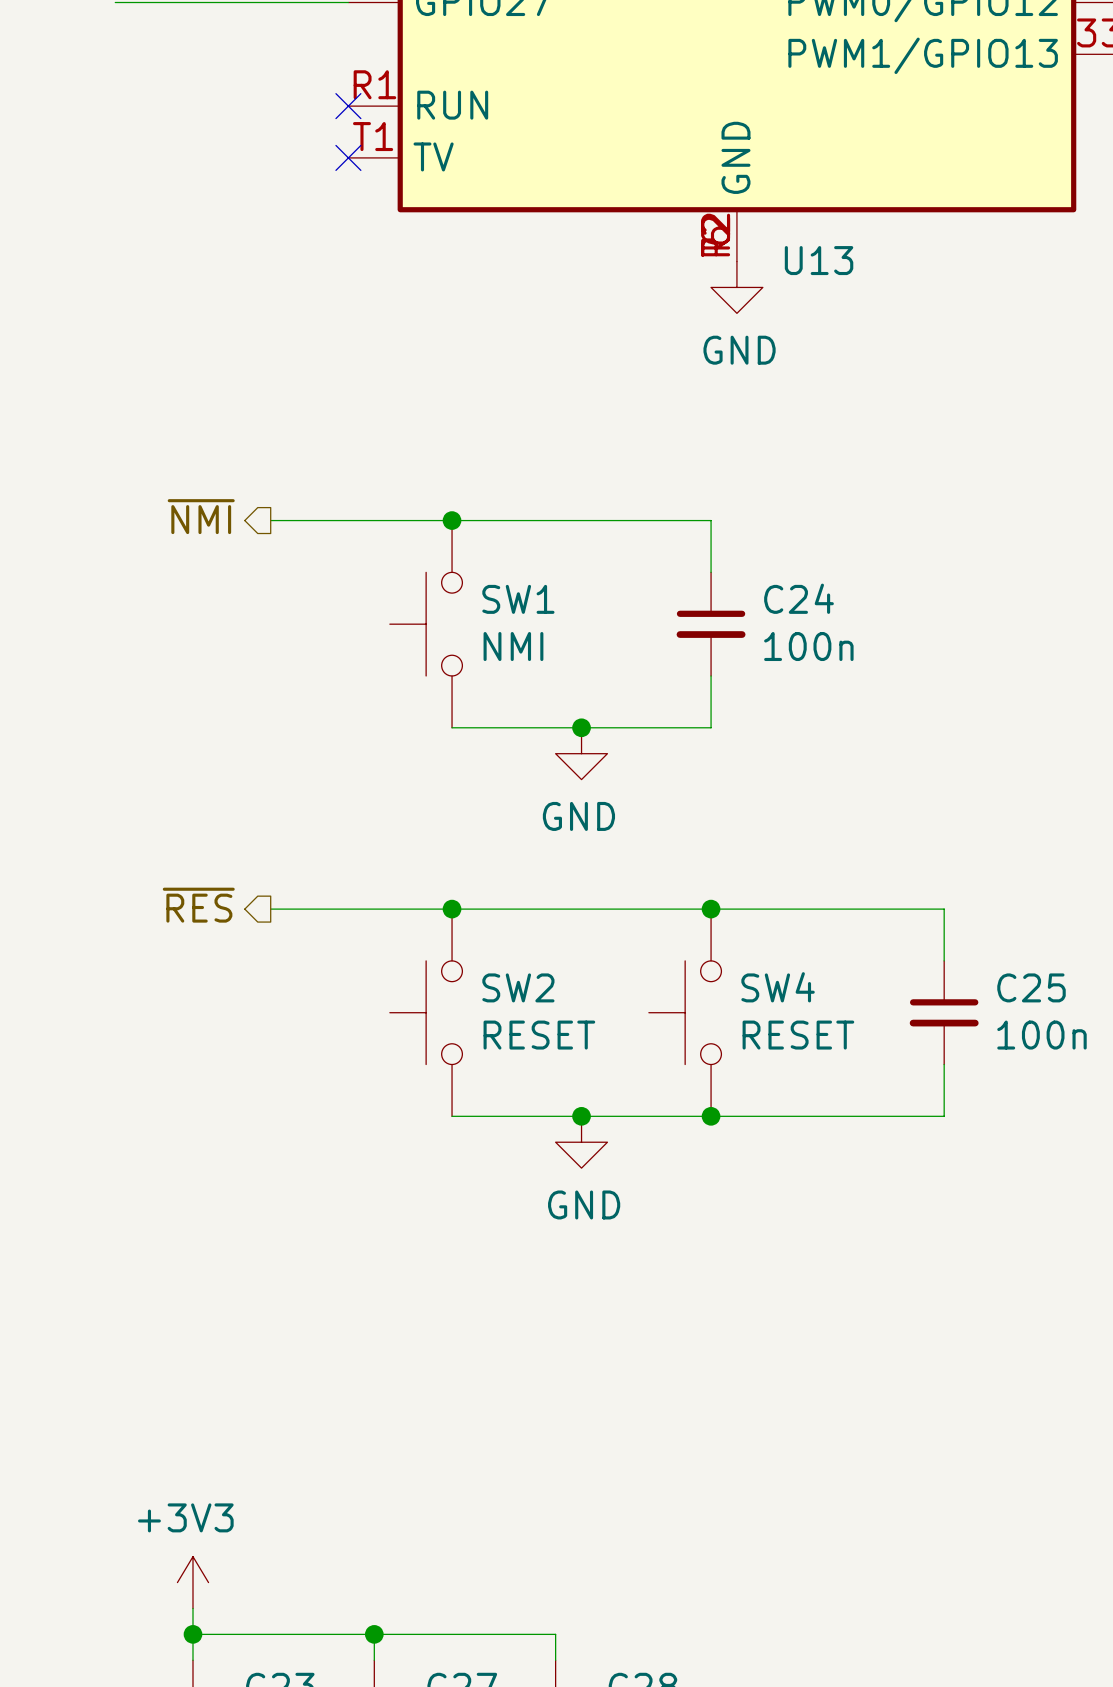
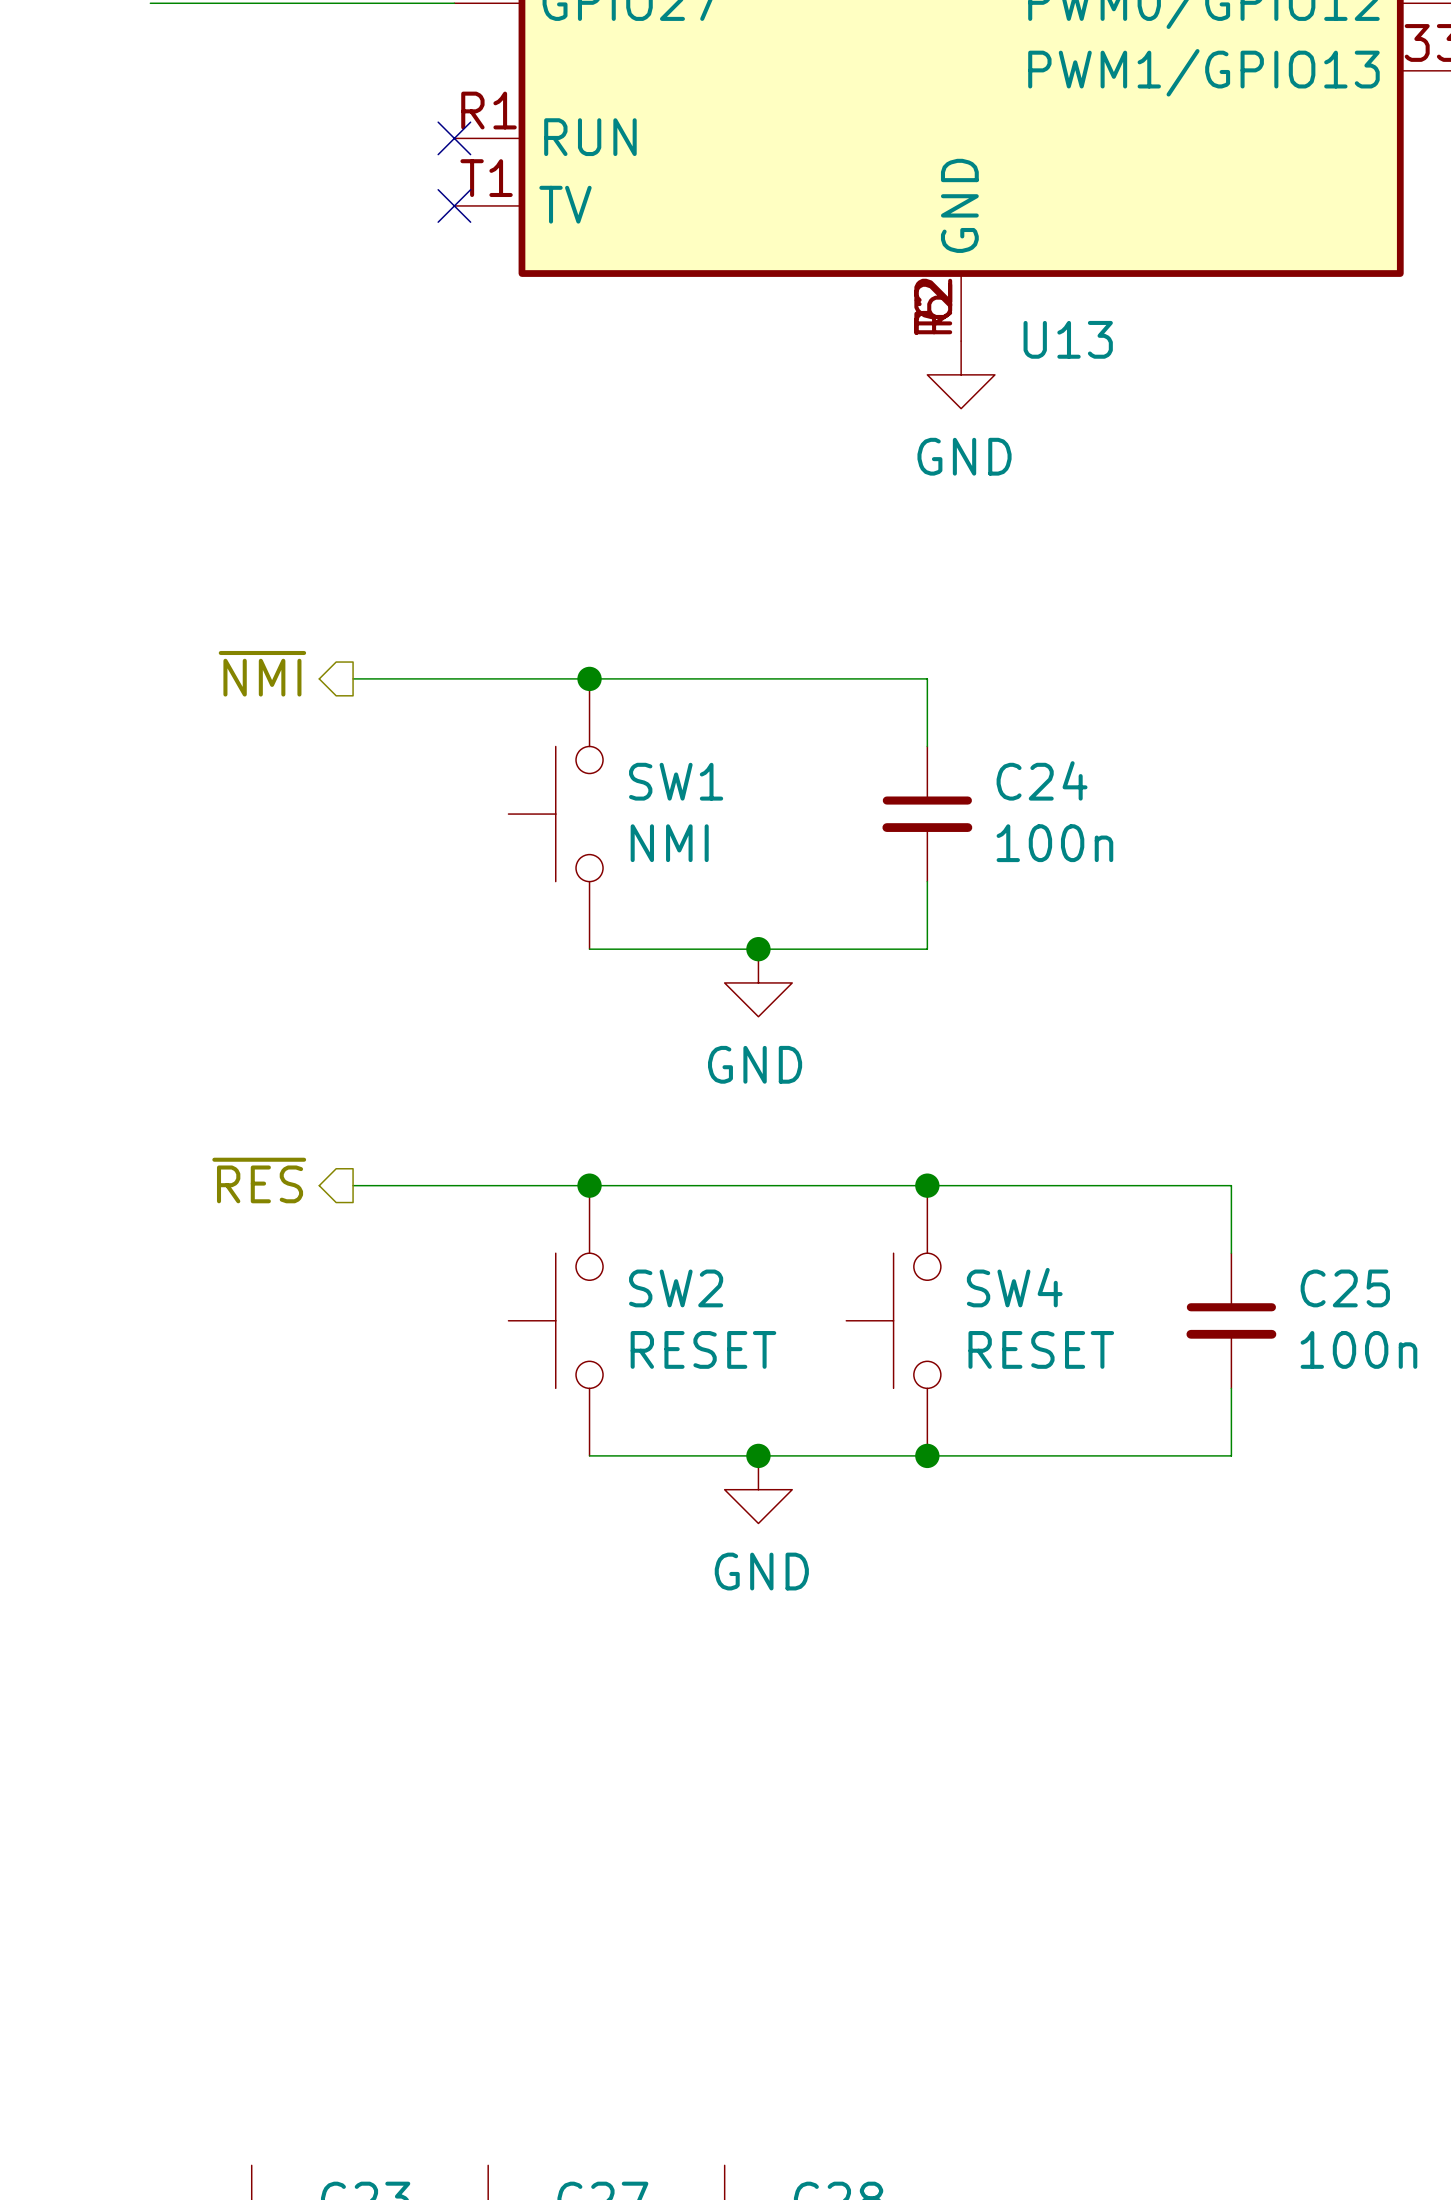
power symbol: +3V3 (192, 1582) -> none
wire: (192, 1608) (192, 1660) -> none
wire: (192, 1634) (555, 1634) (555, 1660) -> none
junction: (192, 1634) -> none
wire: (374, 1634) (374, 1660) -> none
junction: (374, 1634) -> none

